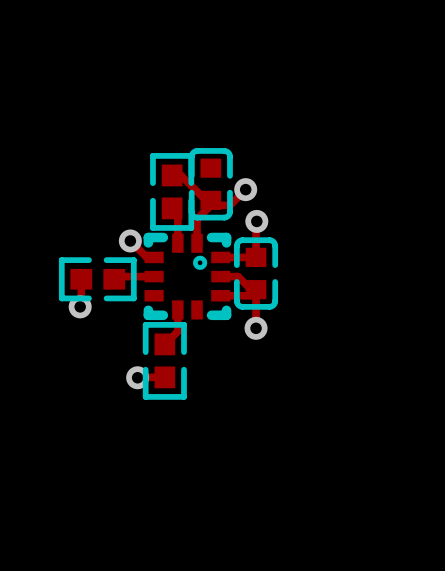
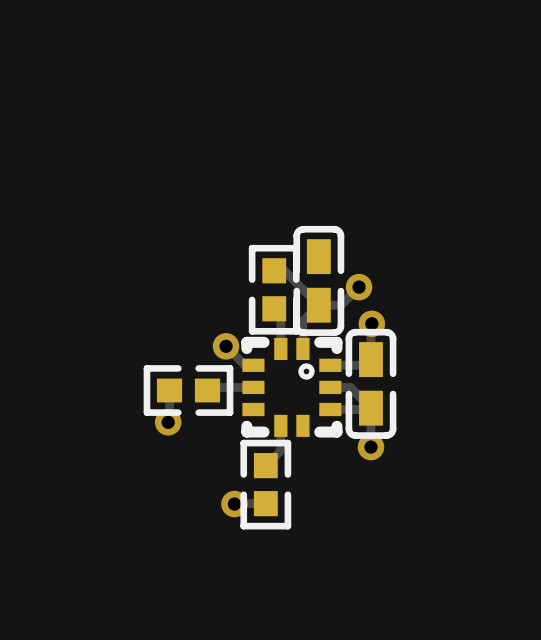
part footprint: [188, 148, 233, 221] -> [293, 225, 345, 336]
part footprint: [234, 237, 279, 310] -> [345, 328, 397, 439]

